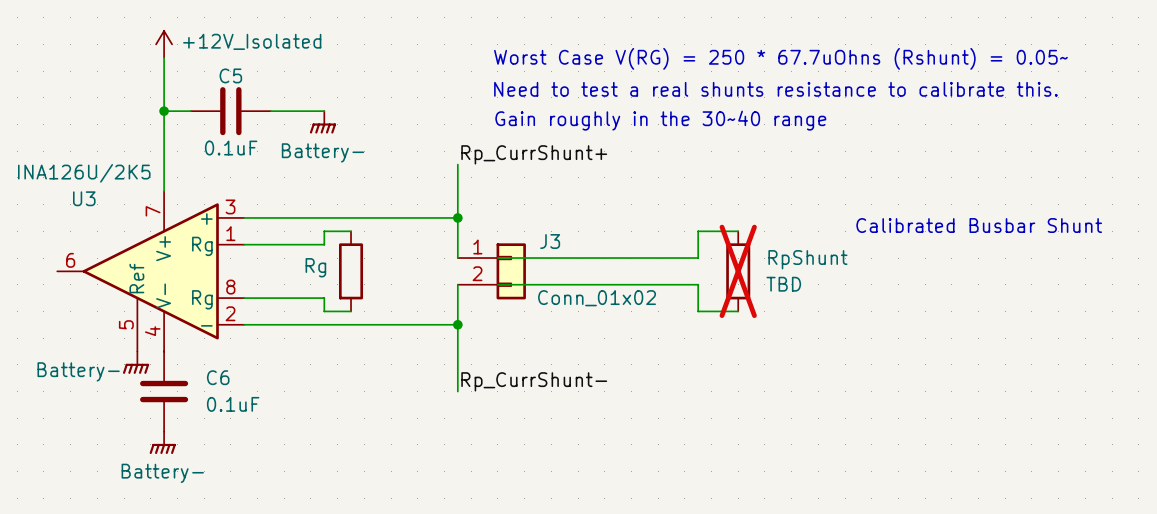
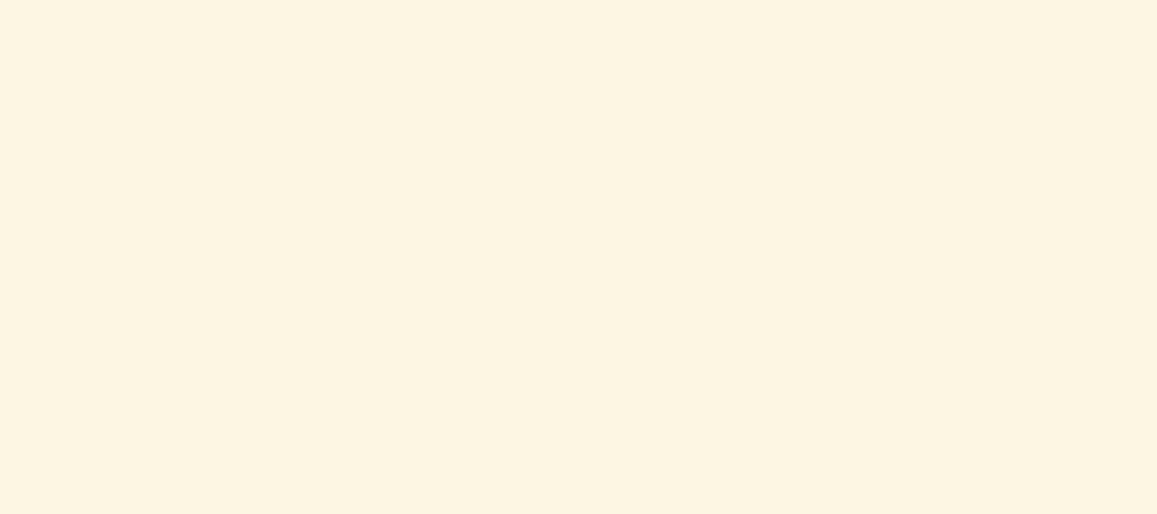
power symbol: +12V_Isolated (164, 44) -> none
wire: (164, 57) (164, 191) -> none
text: Worst Case V(RG) = 250 * 67.7uOhns (Rshunt) = 0.05~ (780, 58) -> none
text: Need to test a real shunts resistance to calibrate this. (775, 89) -> none
wire: (164, 111) (190, 111) -> none
junction: (164, 111) -> none
C5: 0.1uF (230, 111) -> none
wire: (270, 111) (324, 111) -> none
text: Gain roughly in the 30~40 range (660, 120) -> none
power symbol: Battery- (322, 122) -> none
label: Rp_CurrShunt+ (534, 154) -> none
wire: (457, 164) (457, 258) -> none
wire: (244, 217) (457, 217) -> none
junction: (457, 217) -> none
text: Calibrated Busbar Shunt (979, 225) -> none
wire: (351, 231) (324, 231) (324, 244) (244, 244) -> none
wire: (738, 231) (698, 231) (698, 258) (497, 258) -> none
U3: INA126U/2K5 (150, 271) -> none
Rg: (351, 271) -> none
J3: Conn_01x02 (491, 271) -> none
RpShunt: TBD (738, 271) -> none
wire: (457, 284) (457, 391) -> none
wire: (497, 284) (698, 284) (698, 311) (738, 311) -> none
wire: (244, 298) (324, 298) (324, 311) (351, 311) -> none
wire: (244, 324) (457, 324) -> none
junction: (457, 324) -> none
power symbol: Battery- (136, 362) -> none
label: Rp_CurrShunt- (534, 381) -> none
C6: 0.1uF (164, 391) -> none
power symbol: Battery- (162, 442) -> none

